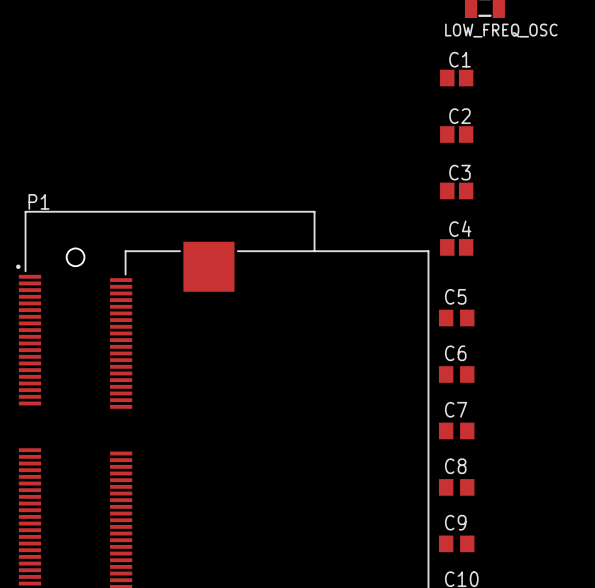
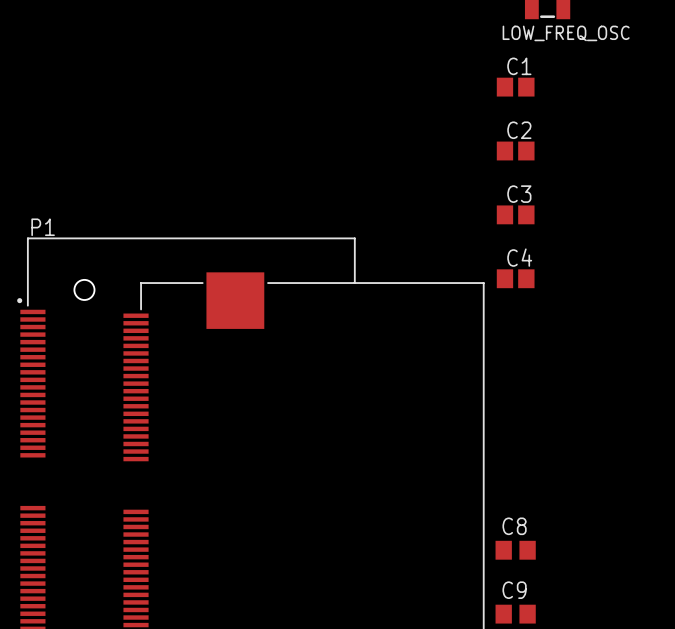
C5: (456, 318) -> none
C6: (456, 374) -> none
C7: (456, 430) -> none

